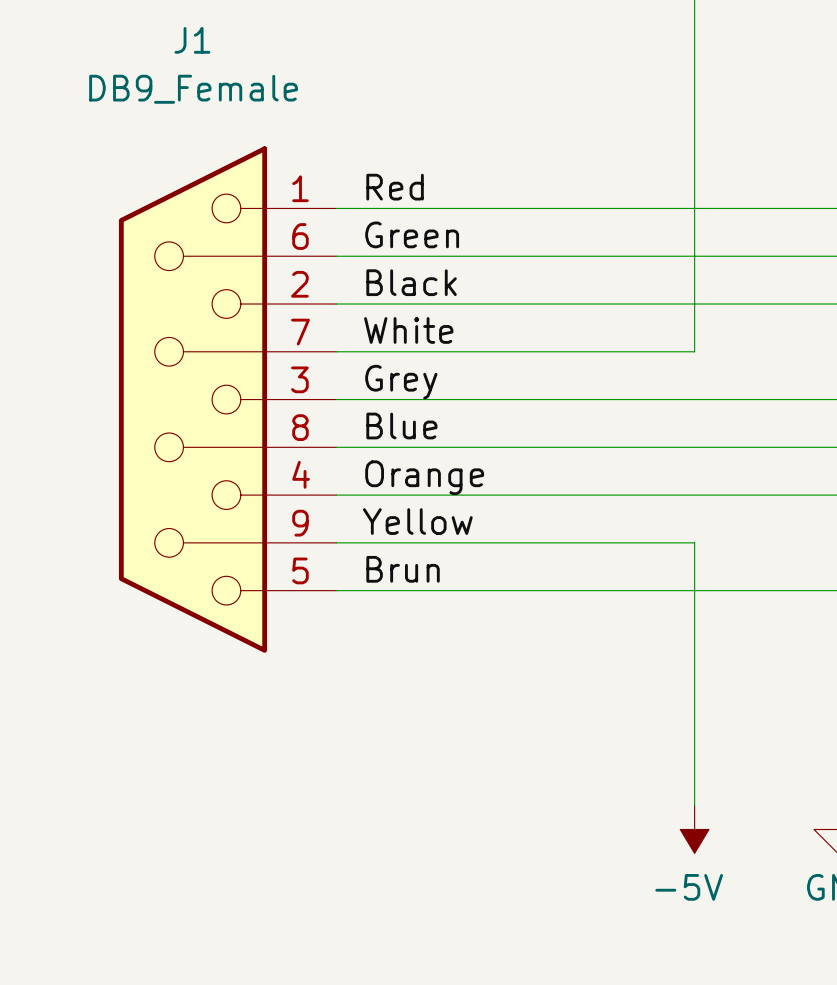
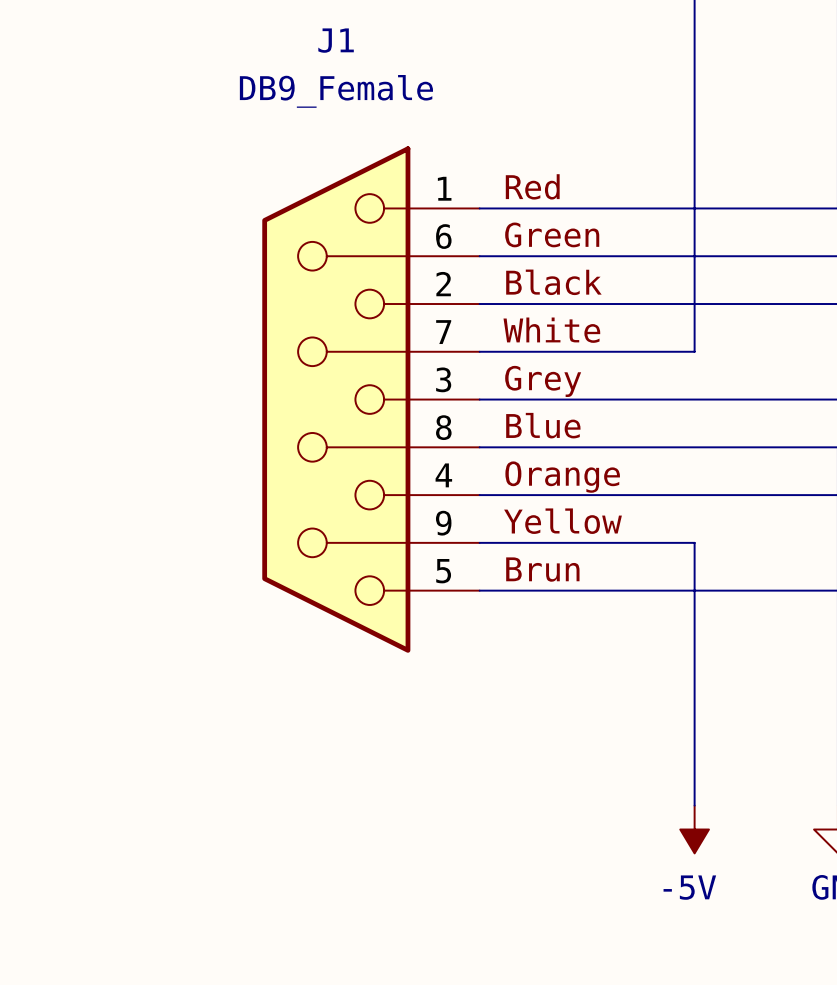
label position: Red (395, 187) -> Red (532, 186)
label position: Green (412, 234) -> Green (552, 234)
label position: Black (411, 282) -> Black (553, 282)
label position: White (408, 330) -> White (551, 330)
label position: Grey (401, 382) -> Grey (543, 381)
J1 position: (227, 399) -> (370, 399)
label position: Blue (401, 426) -> Blue (543, 425)
label position: Orange (424, 477) -> Orange (562, 477)
label position: Yellow (417, 521) -> Yellow (562, 521)
label position: Brun (403, 569) -> Brun (542, 569)

